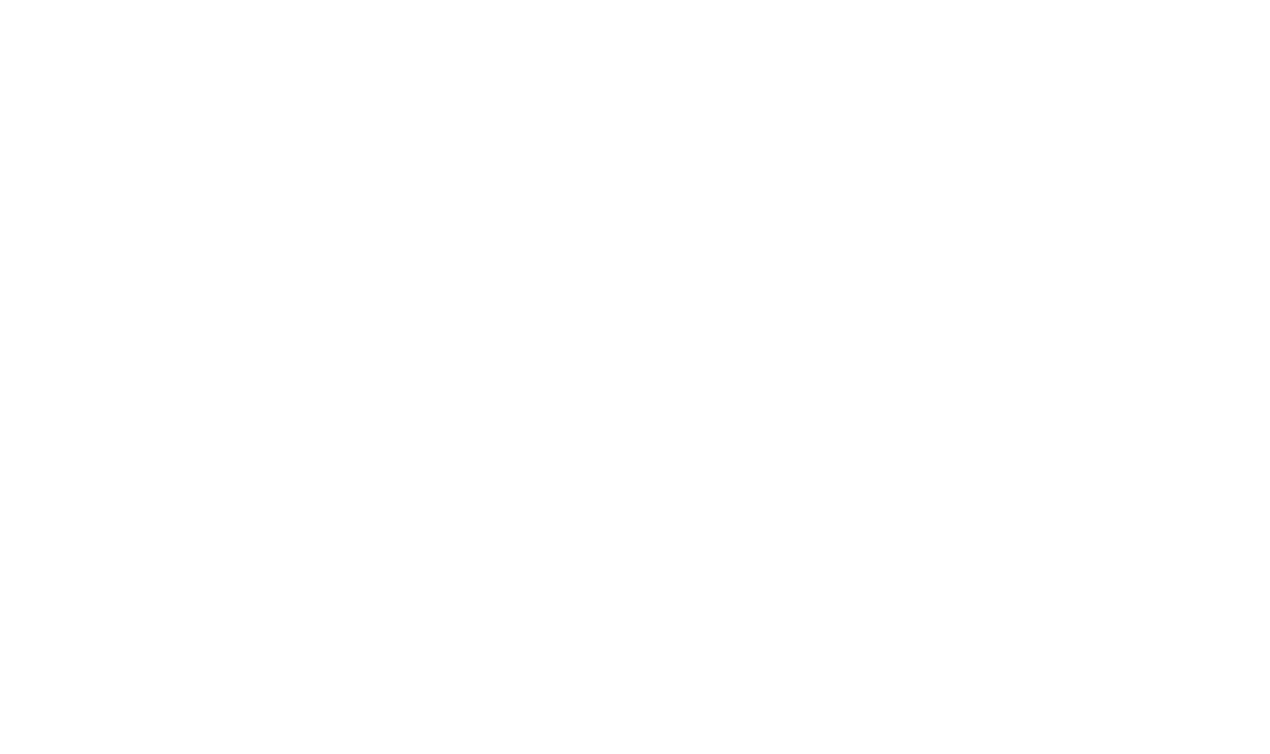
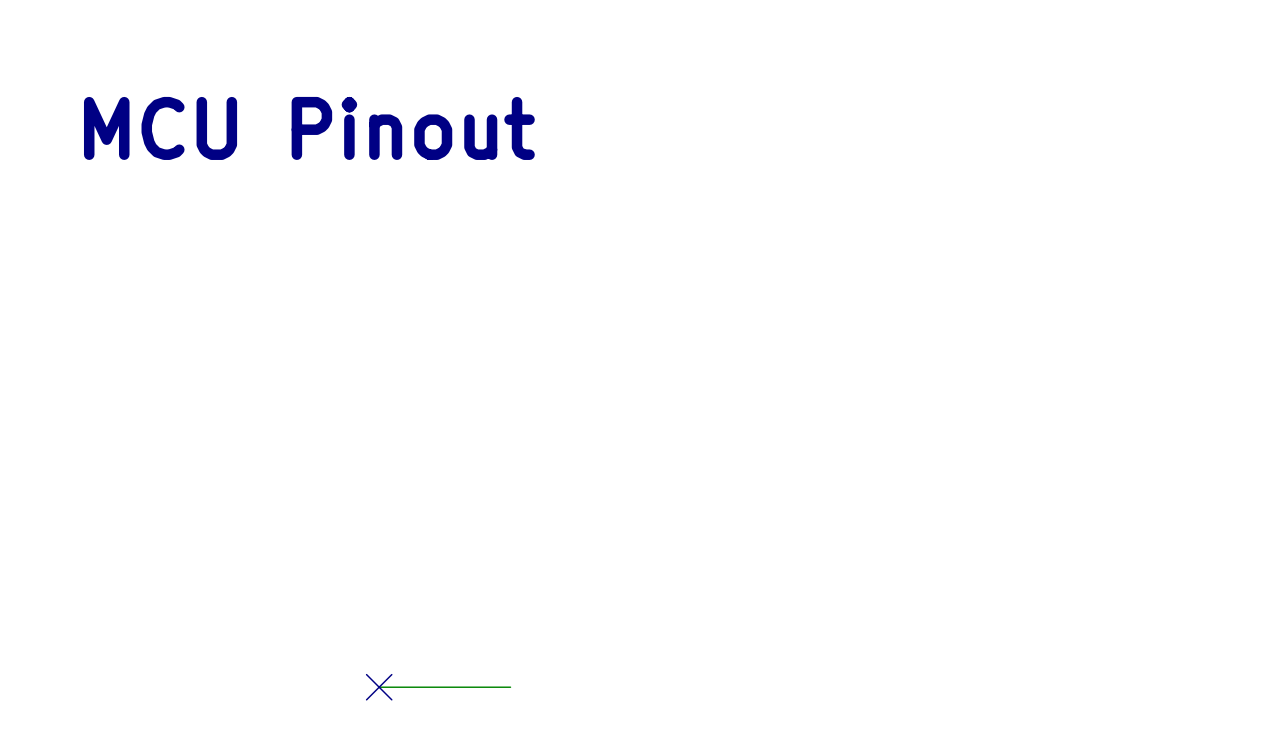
text: none -> MCU Pinout (309, 128)
wire: none -> (379, 687) (510, 687)
no-connect mark: none -> (379, 687)

